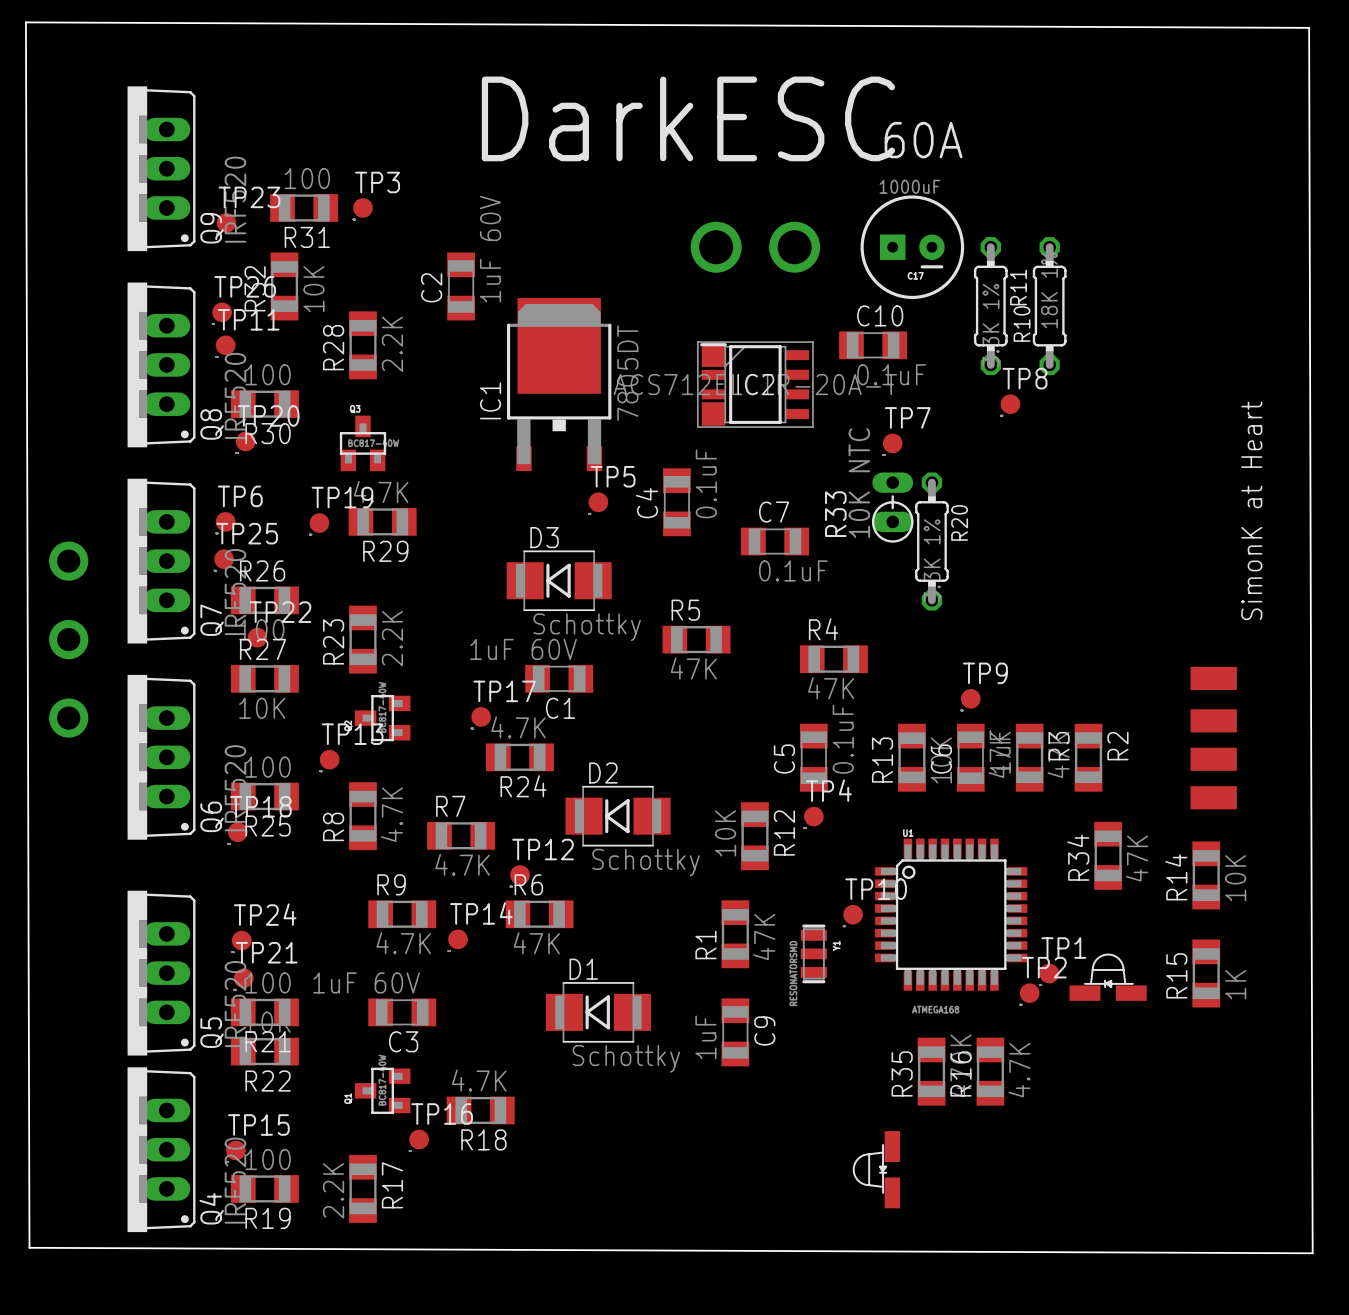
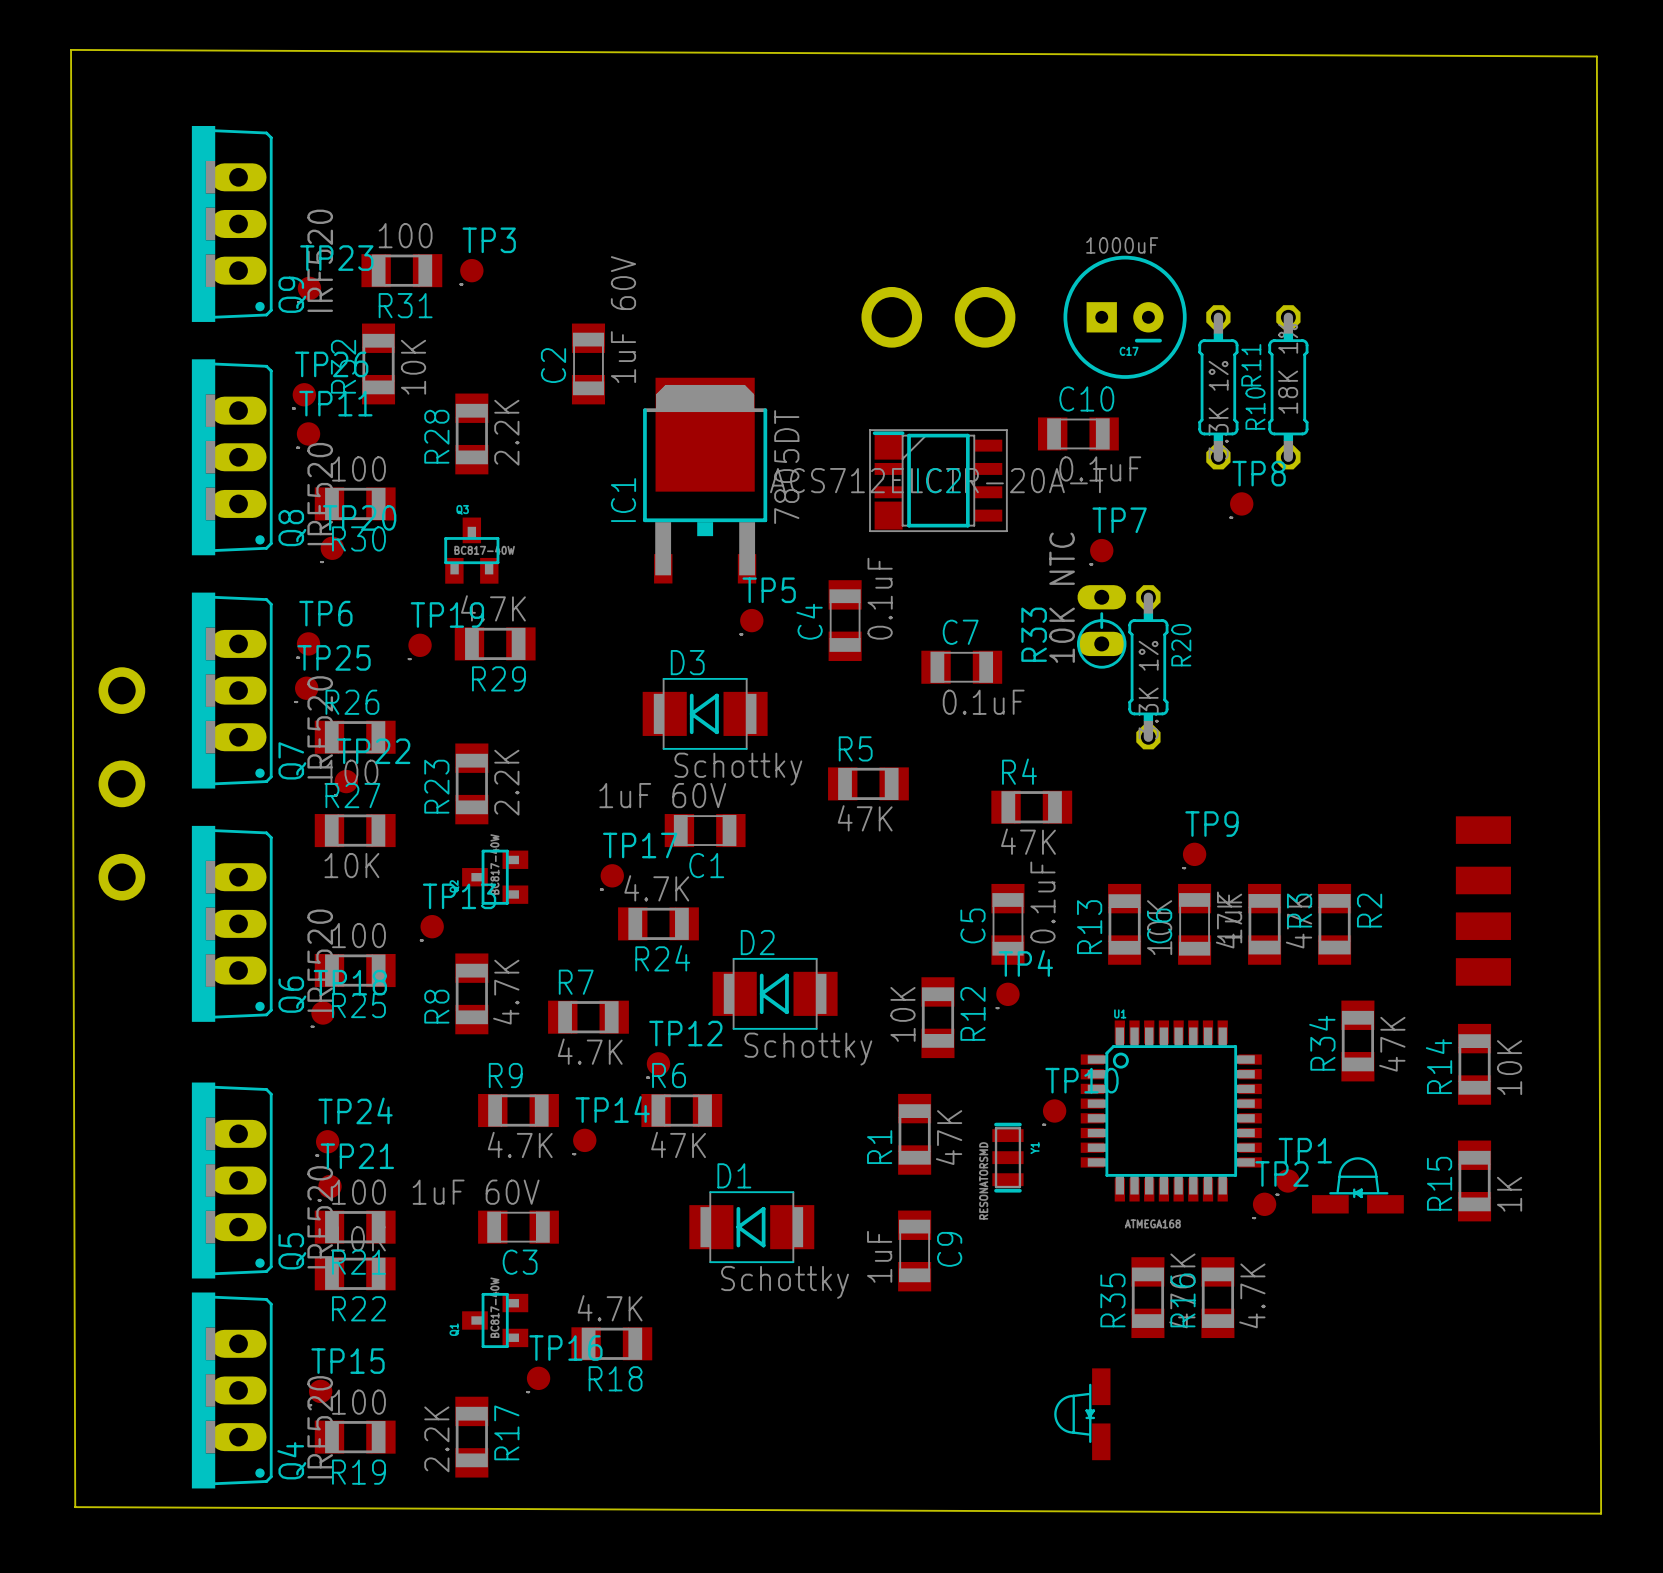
text: DarkESC (688, 118) -> none
text: 60A (923, 140) -> none
text: SimonK at Heart (1251, 510) -> none

